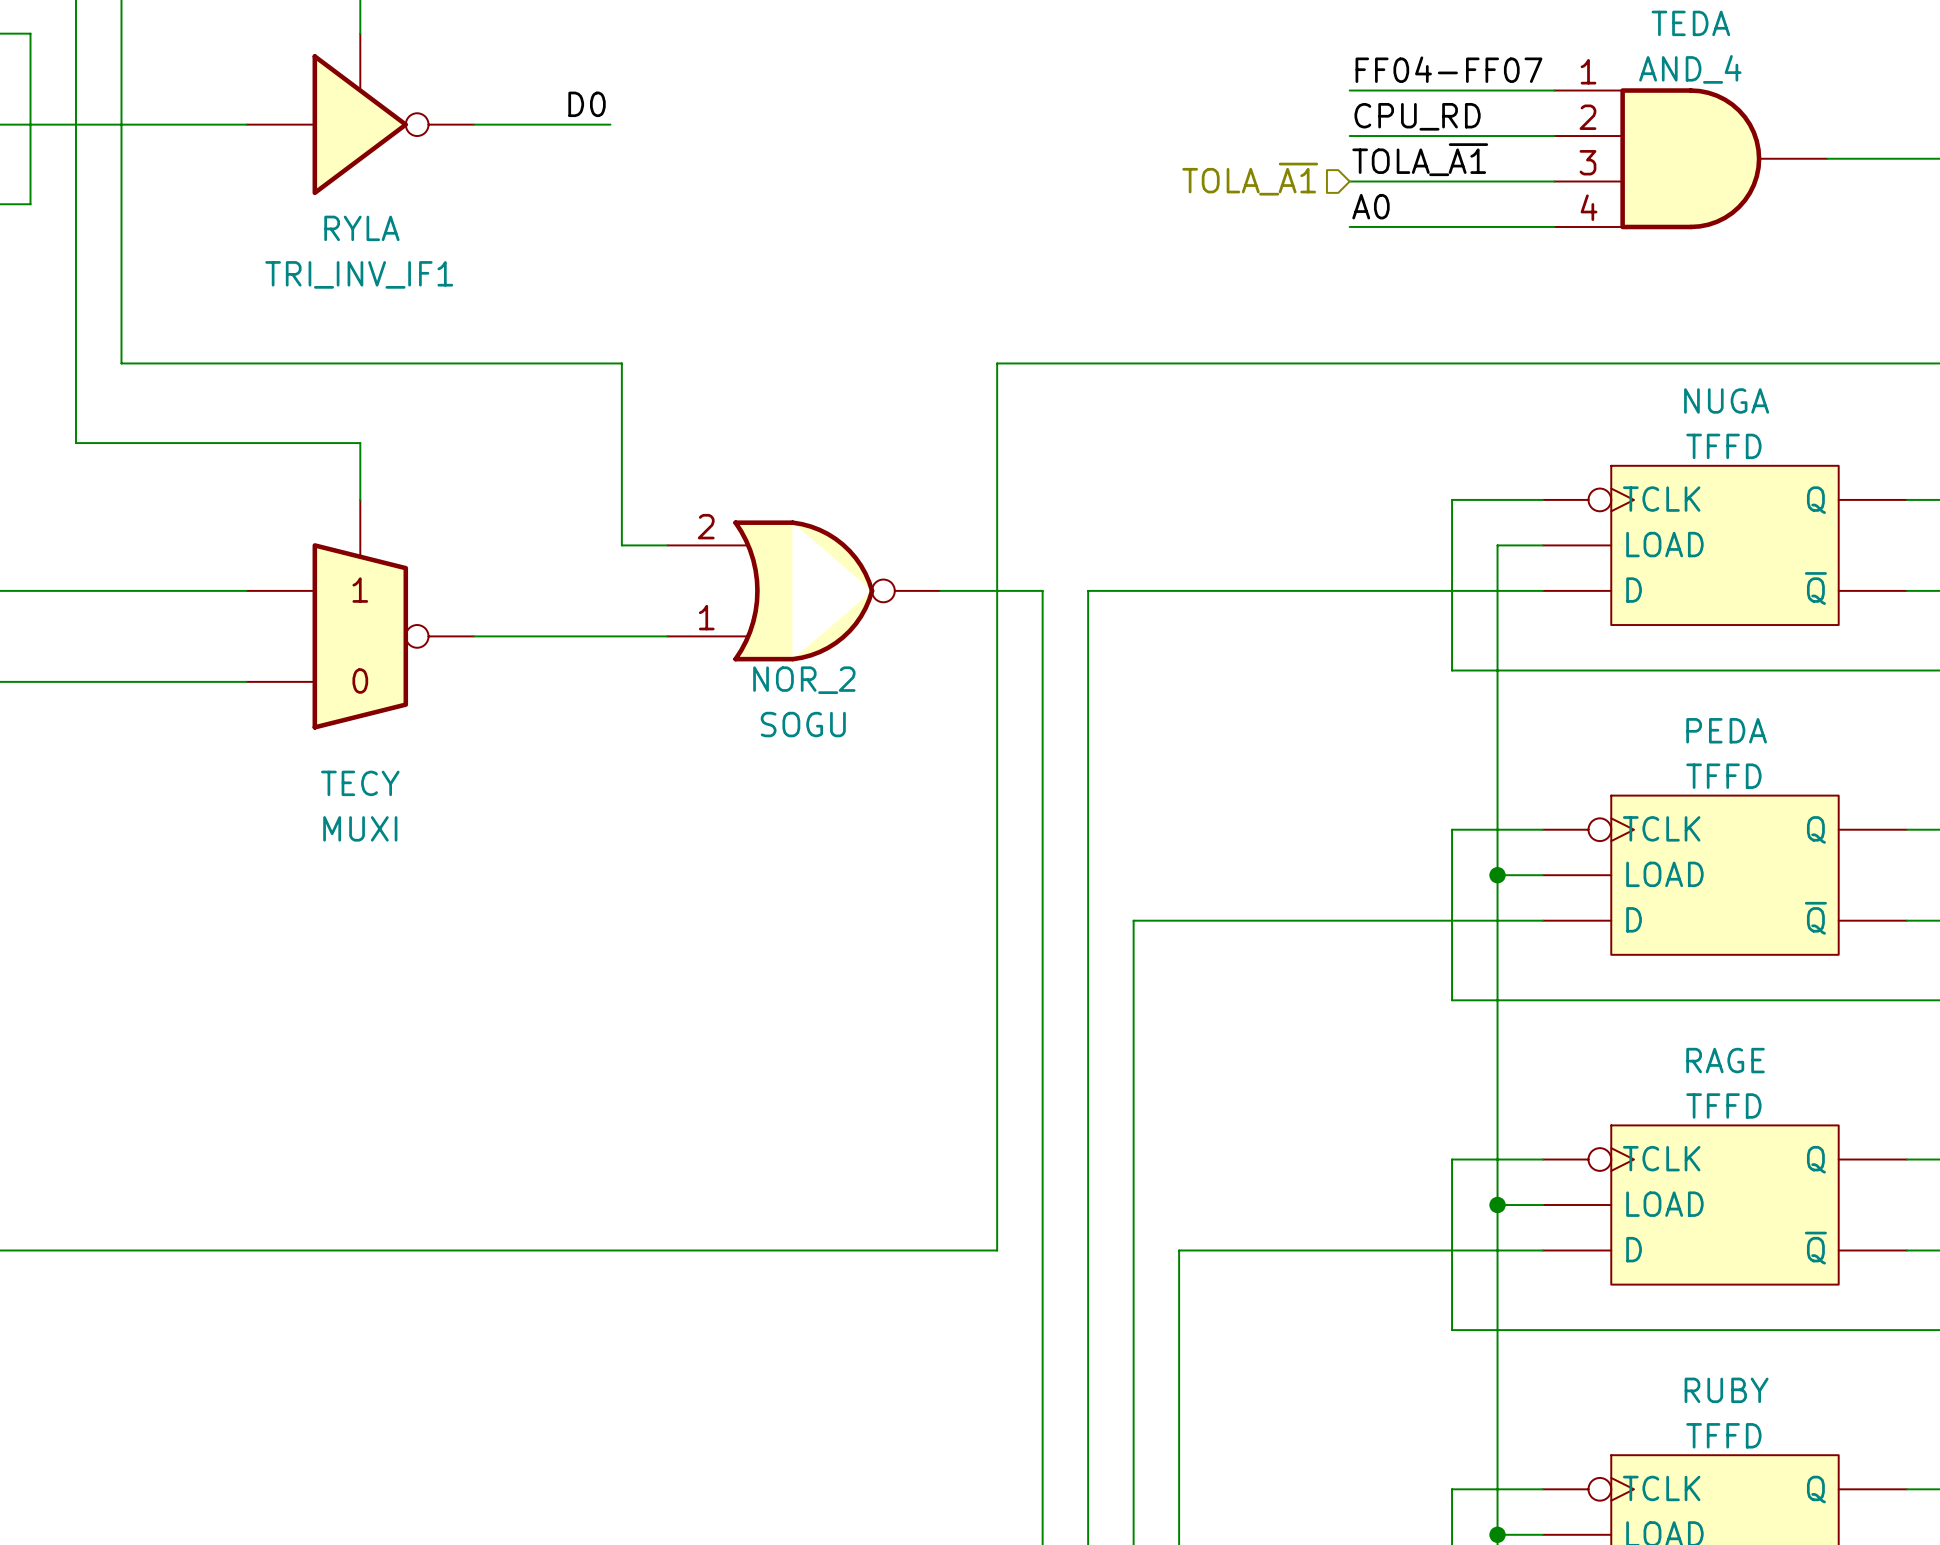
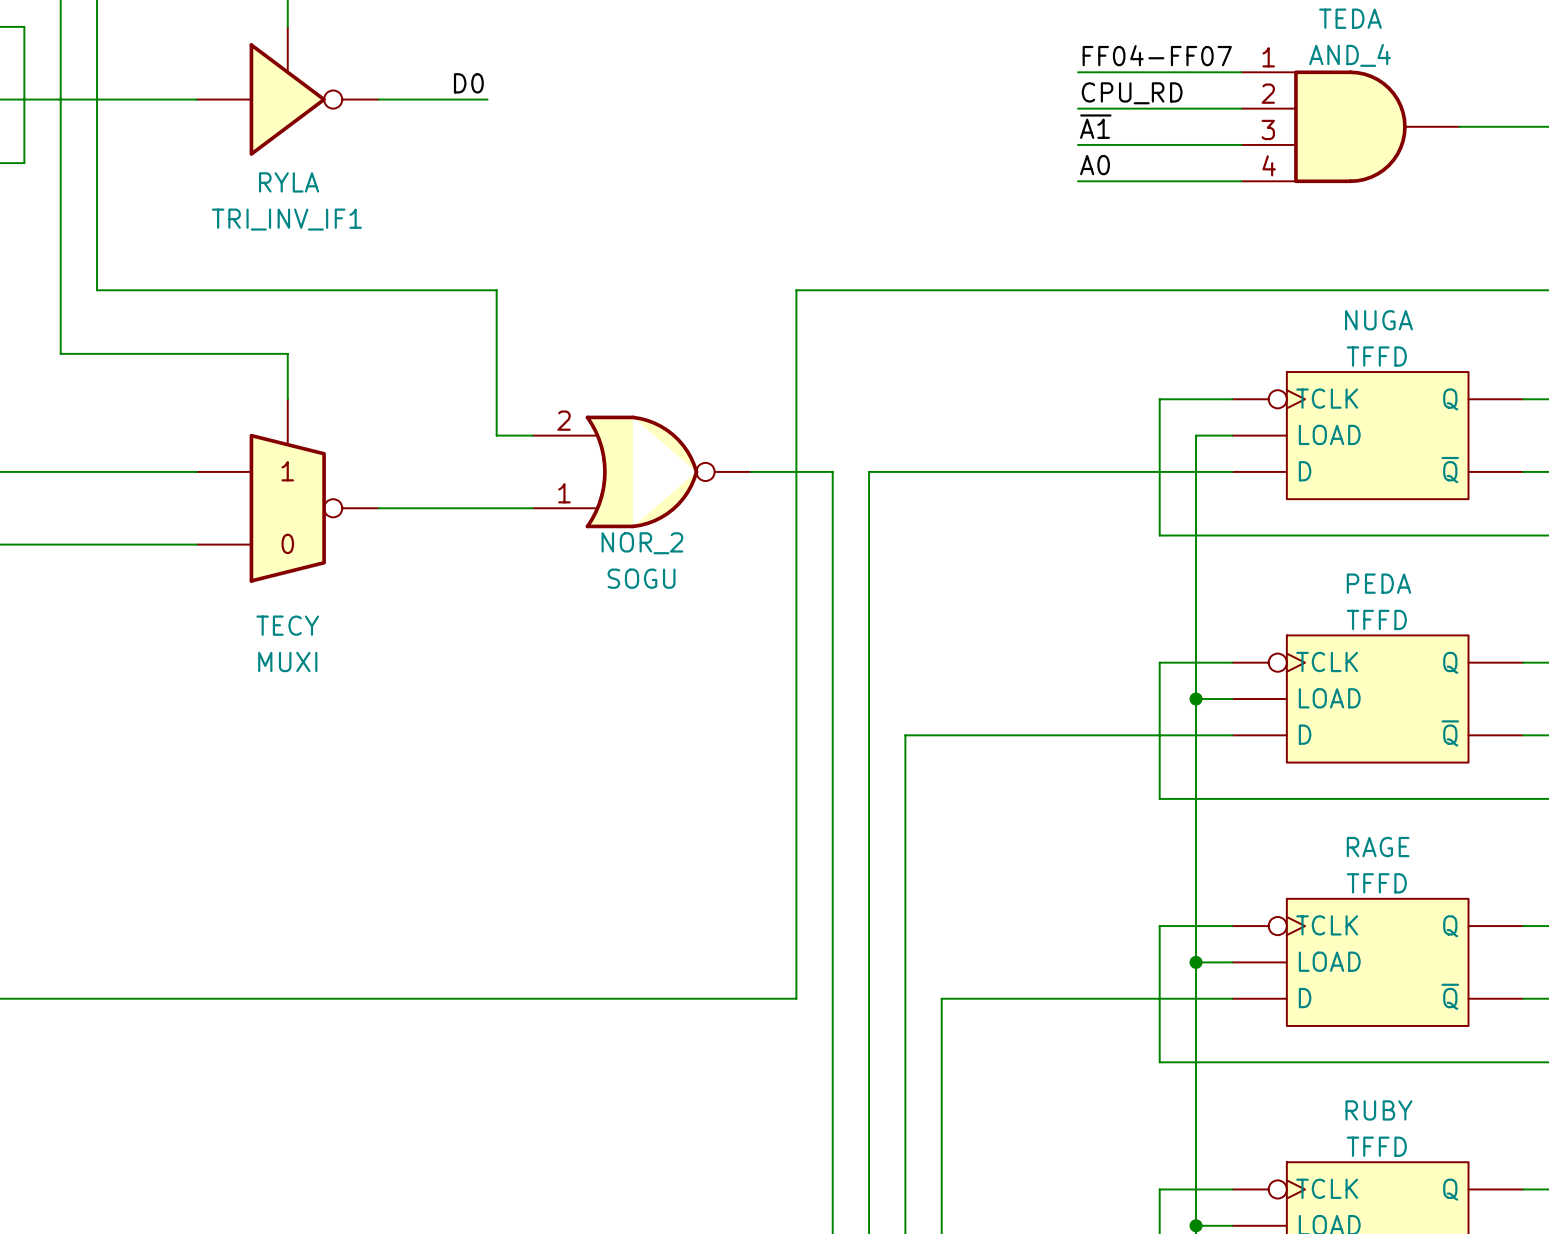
label: TOLA_~{A1} (1420, 159) -> ~{A1} (1095, 126)
hierarchical label: TOLA_~{A1} (1250, 179) -> none

